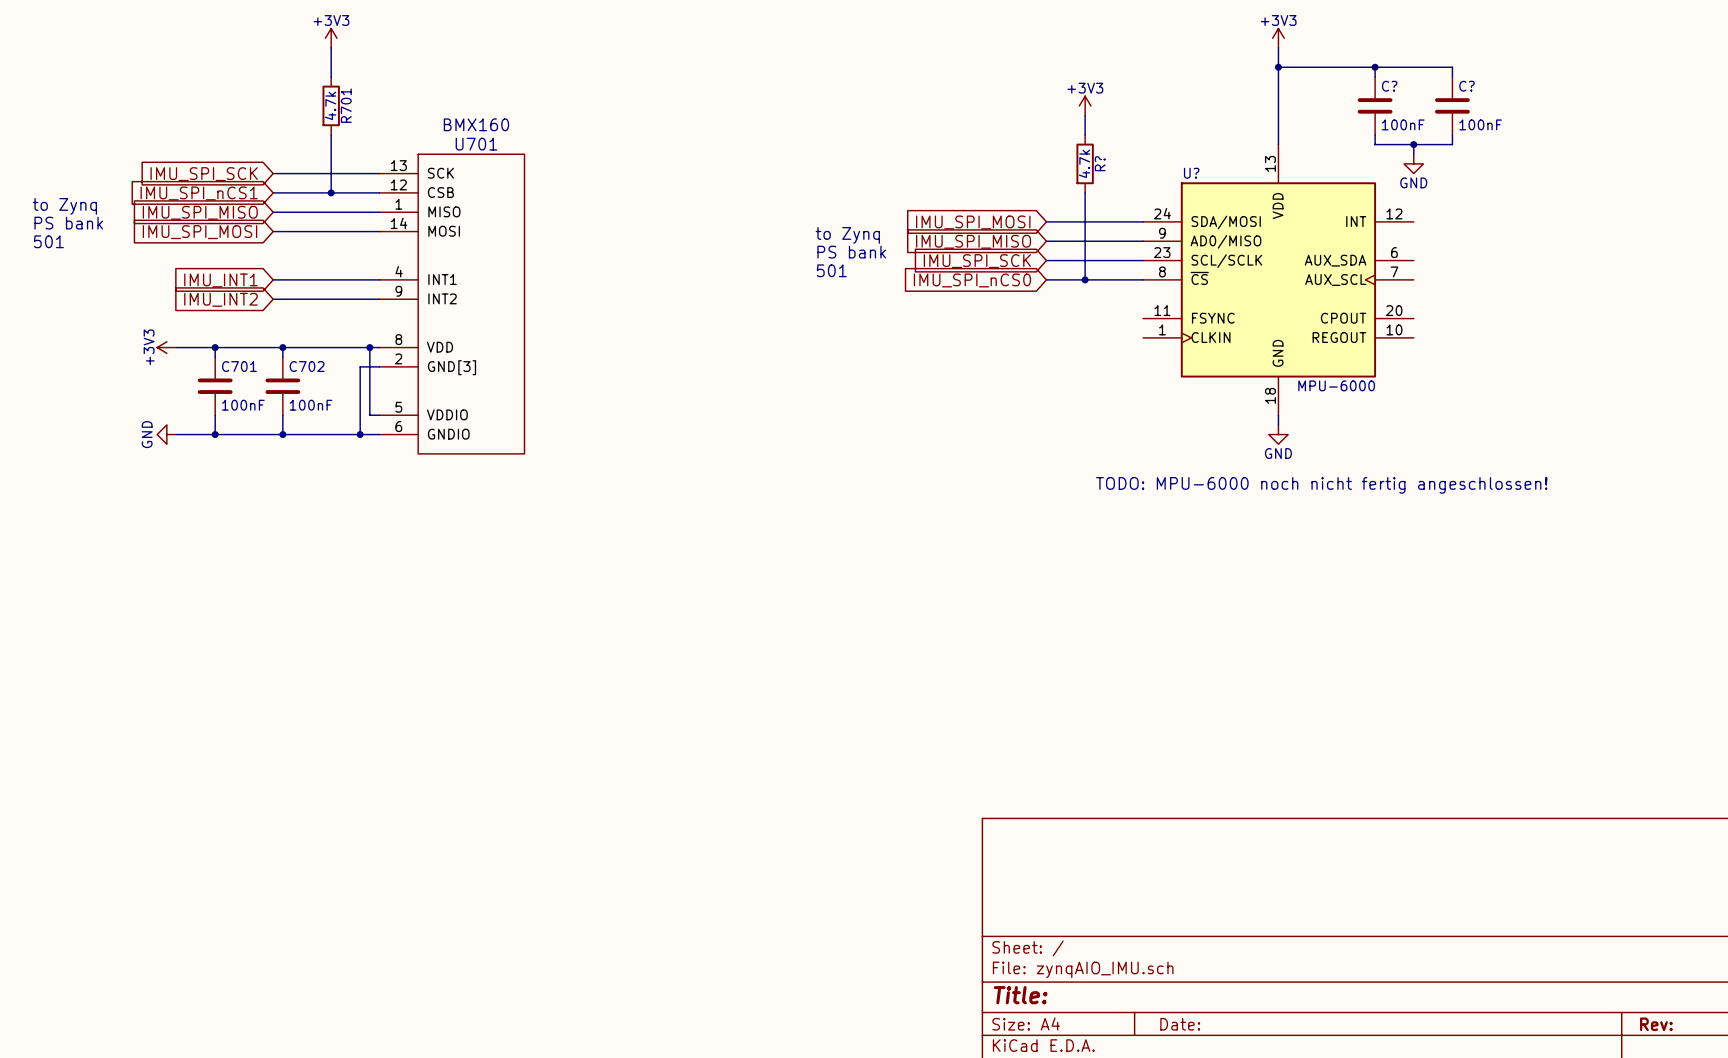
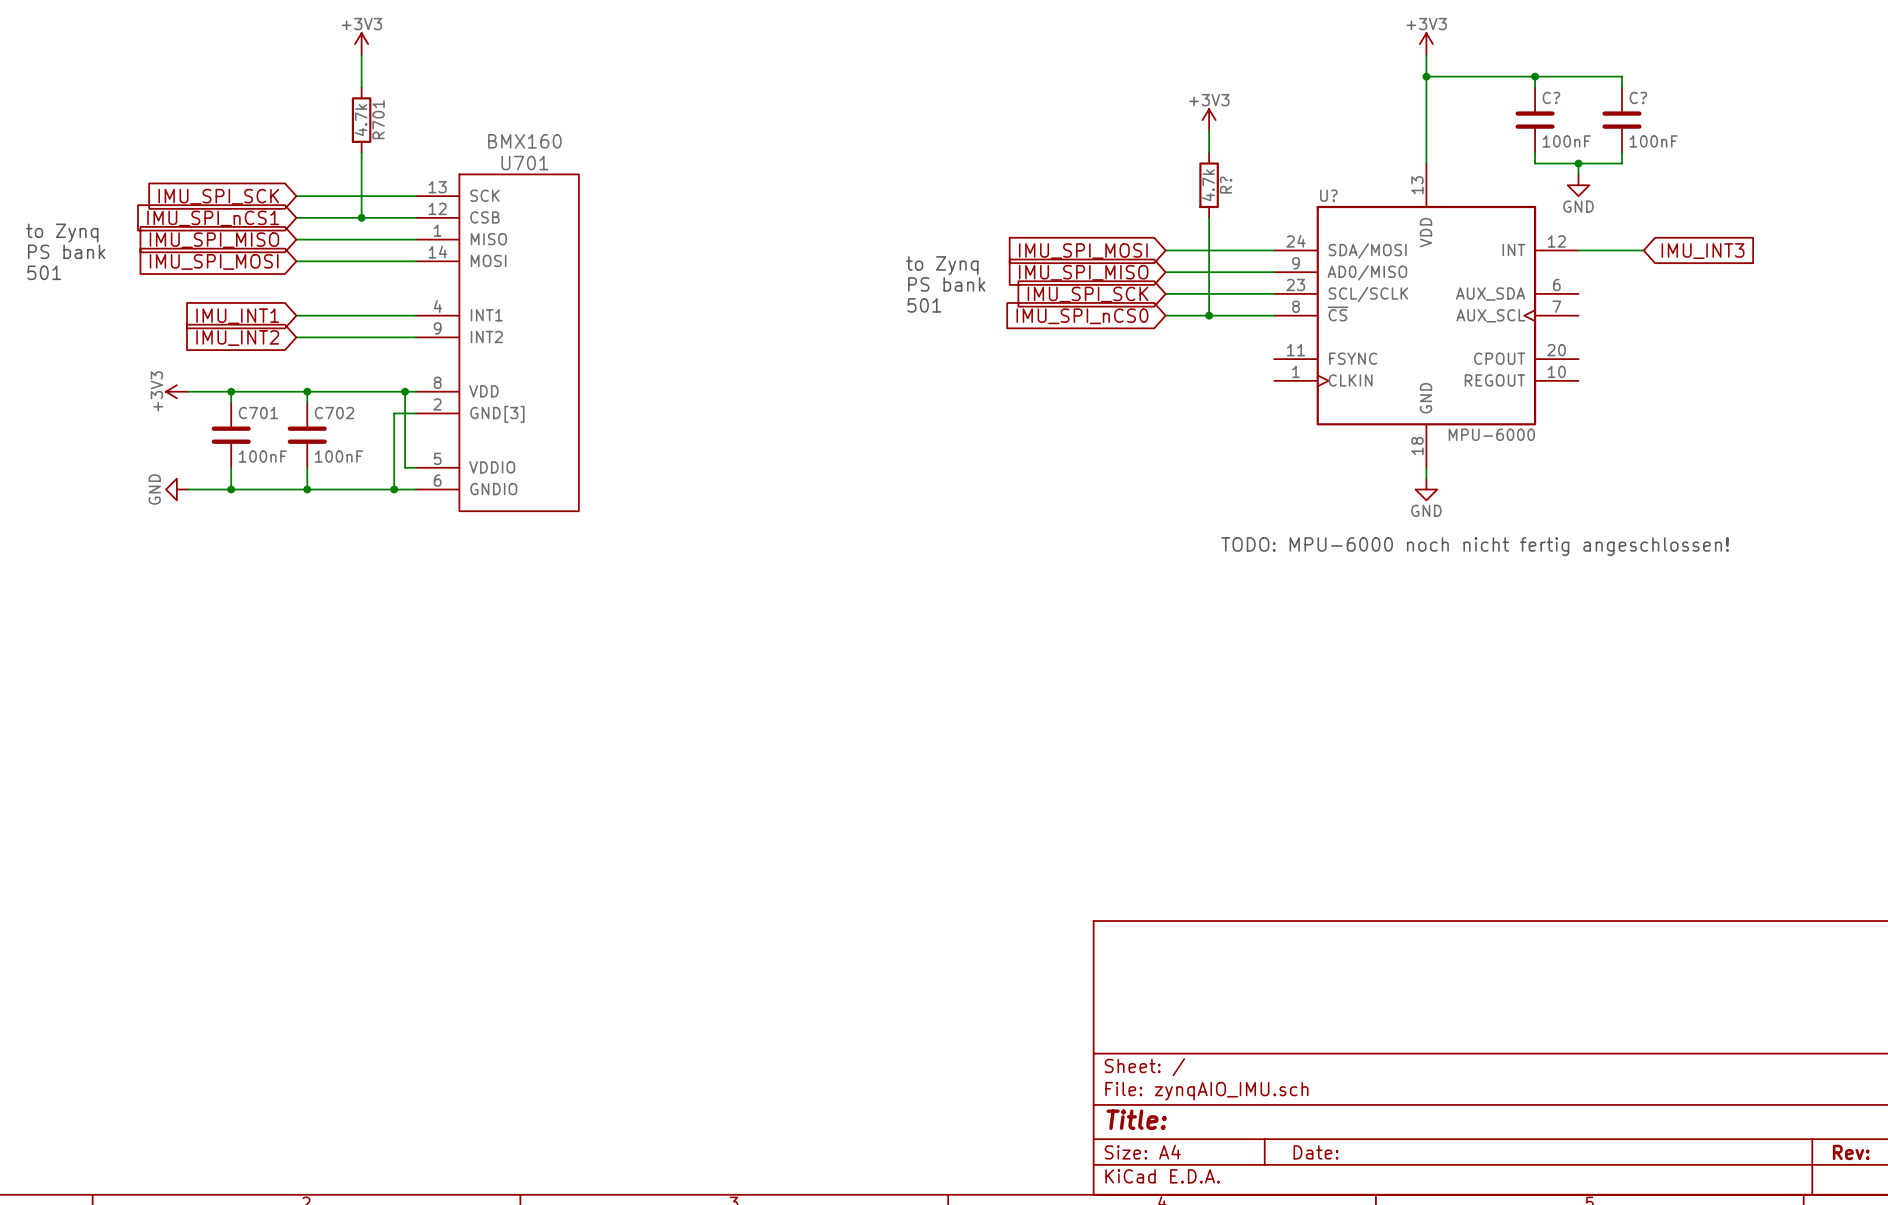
wire: none -> (1578, 250) (1643, 250)
global label: none -> IMU_INT3 (1703, 251)

